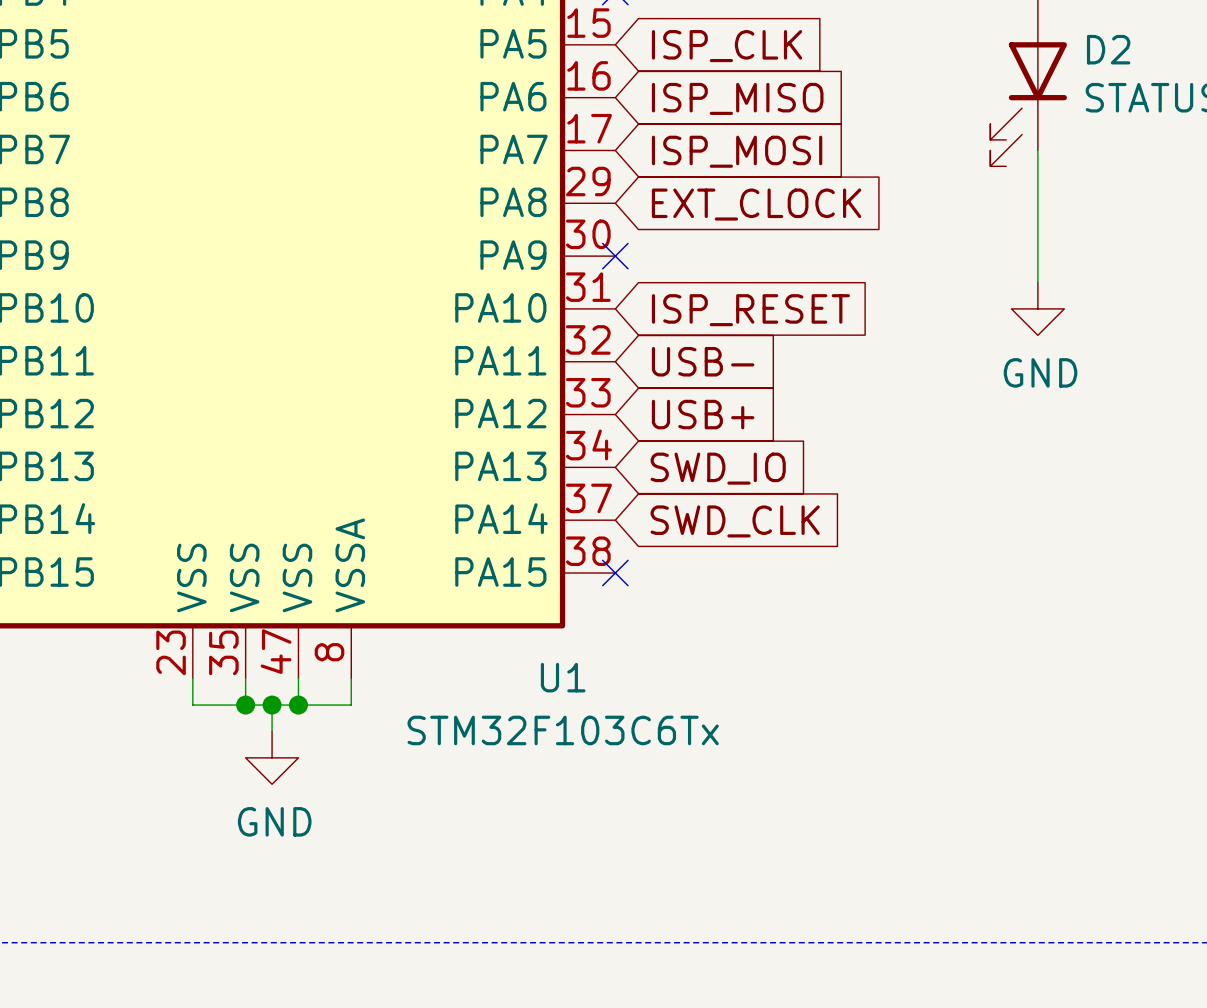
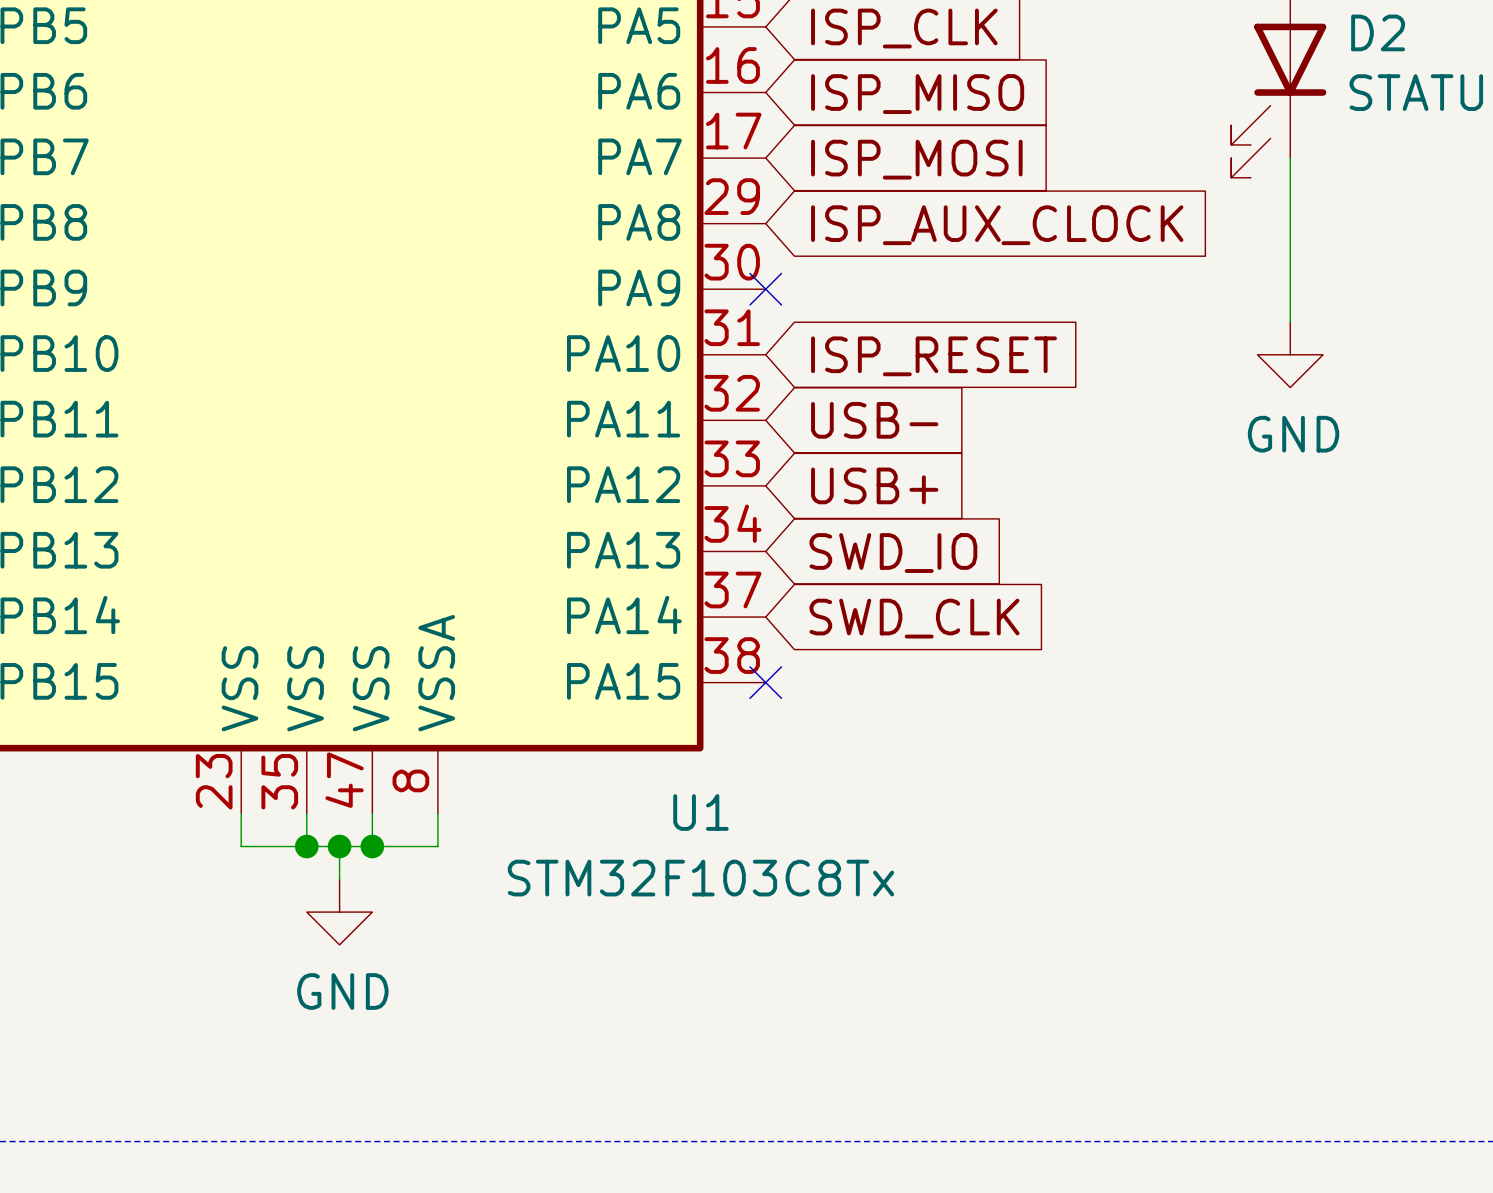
global label: EXT_CLOCK (756, 204) -> ISP_AUX_CLOCK (997, 225)
U1 value: STM32F103C6Tx (563, 730) -> STM32F103C8Tx (700, 878)

